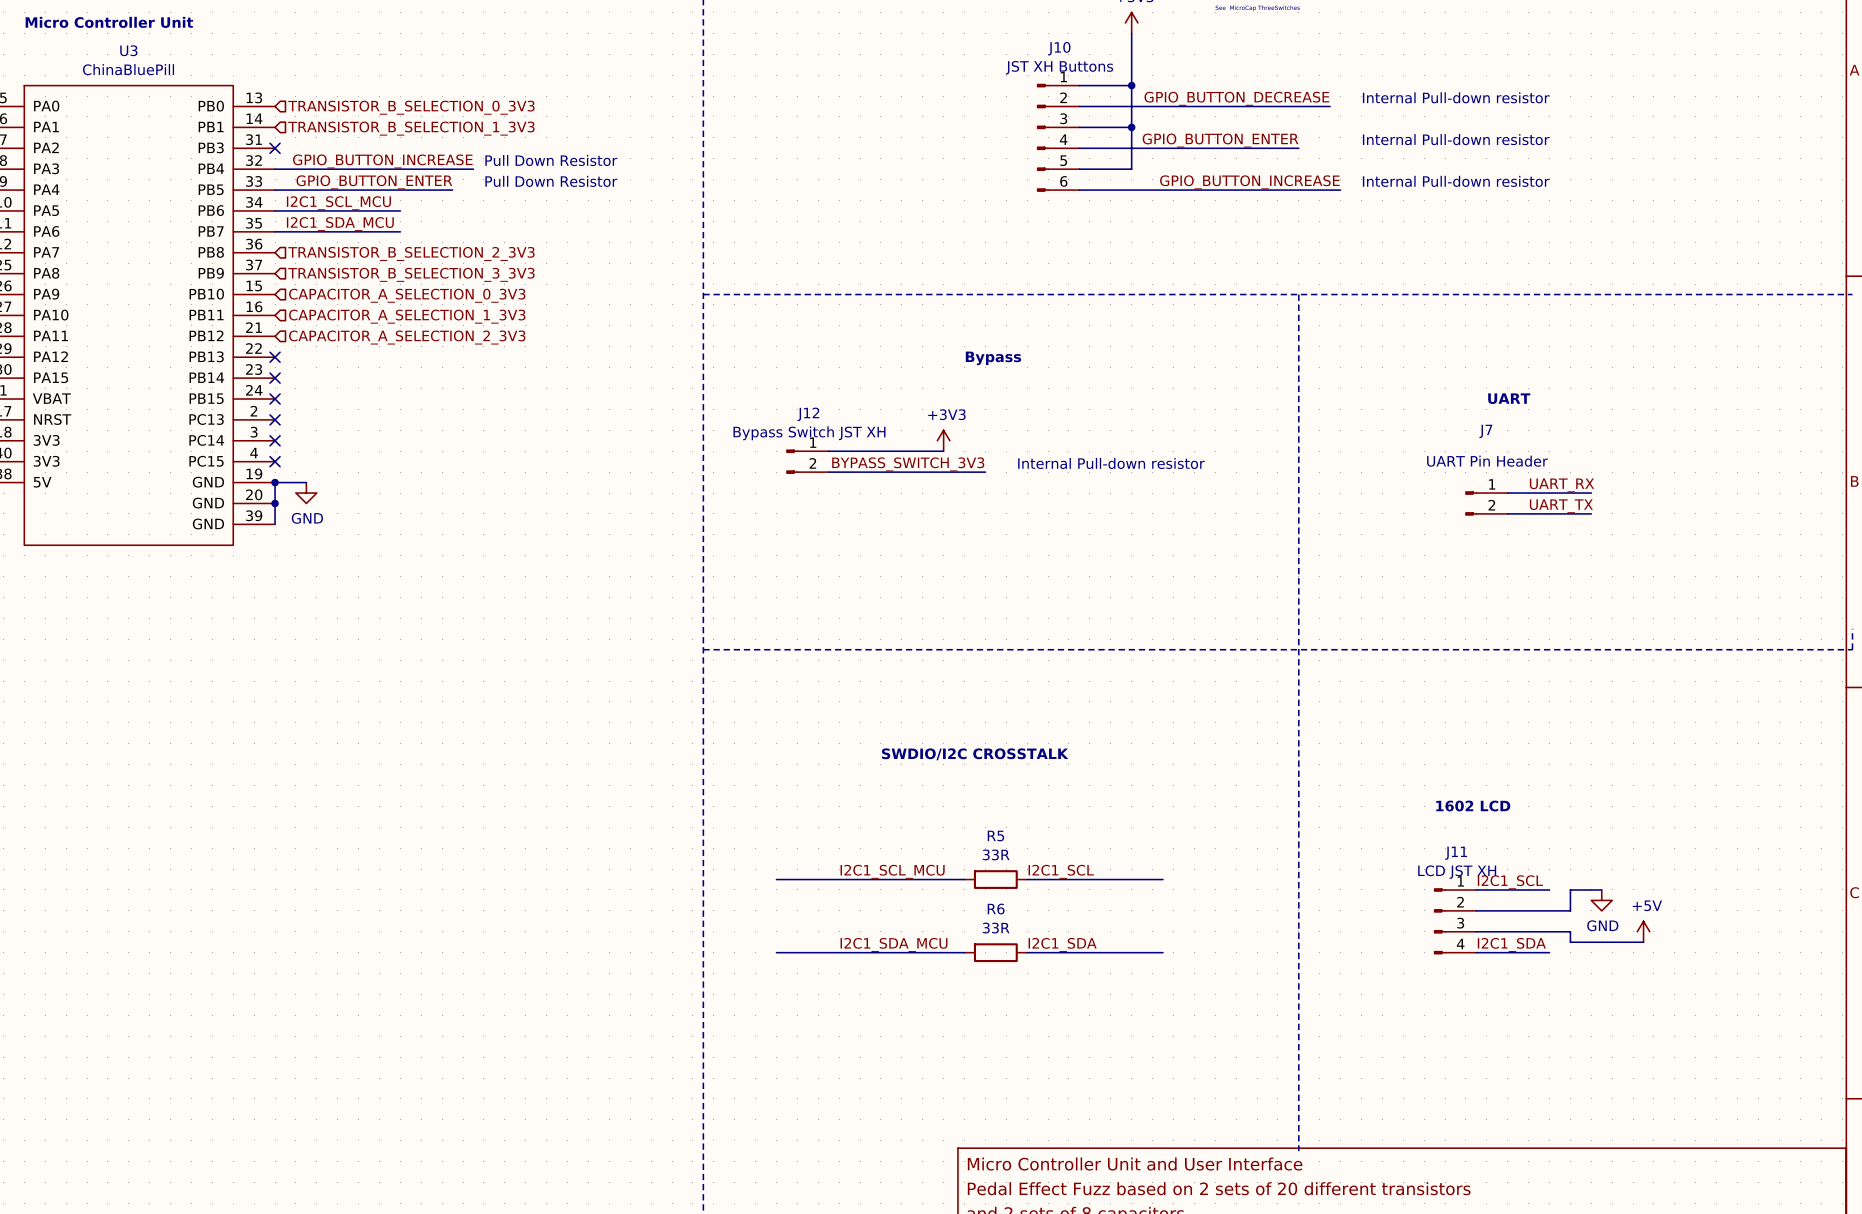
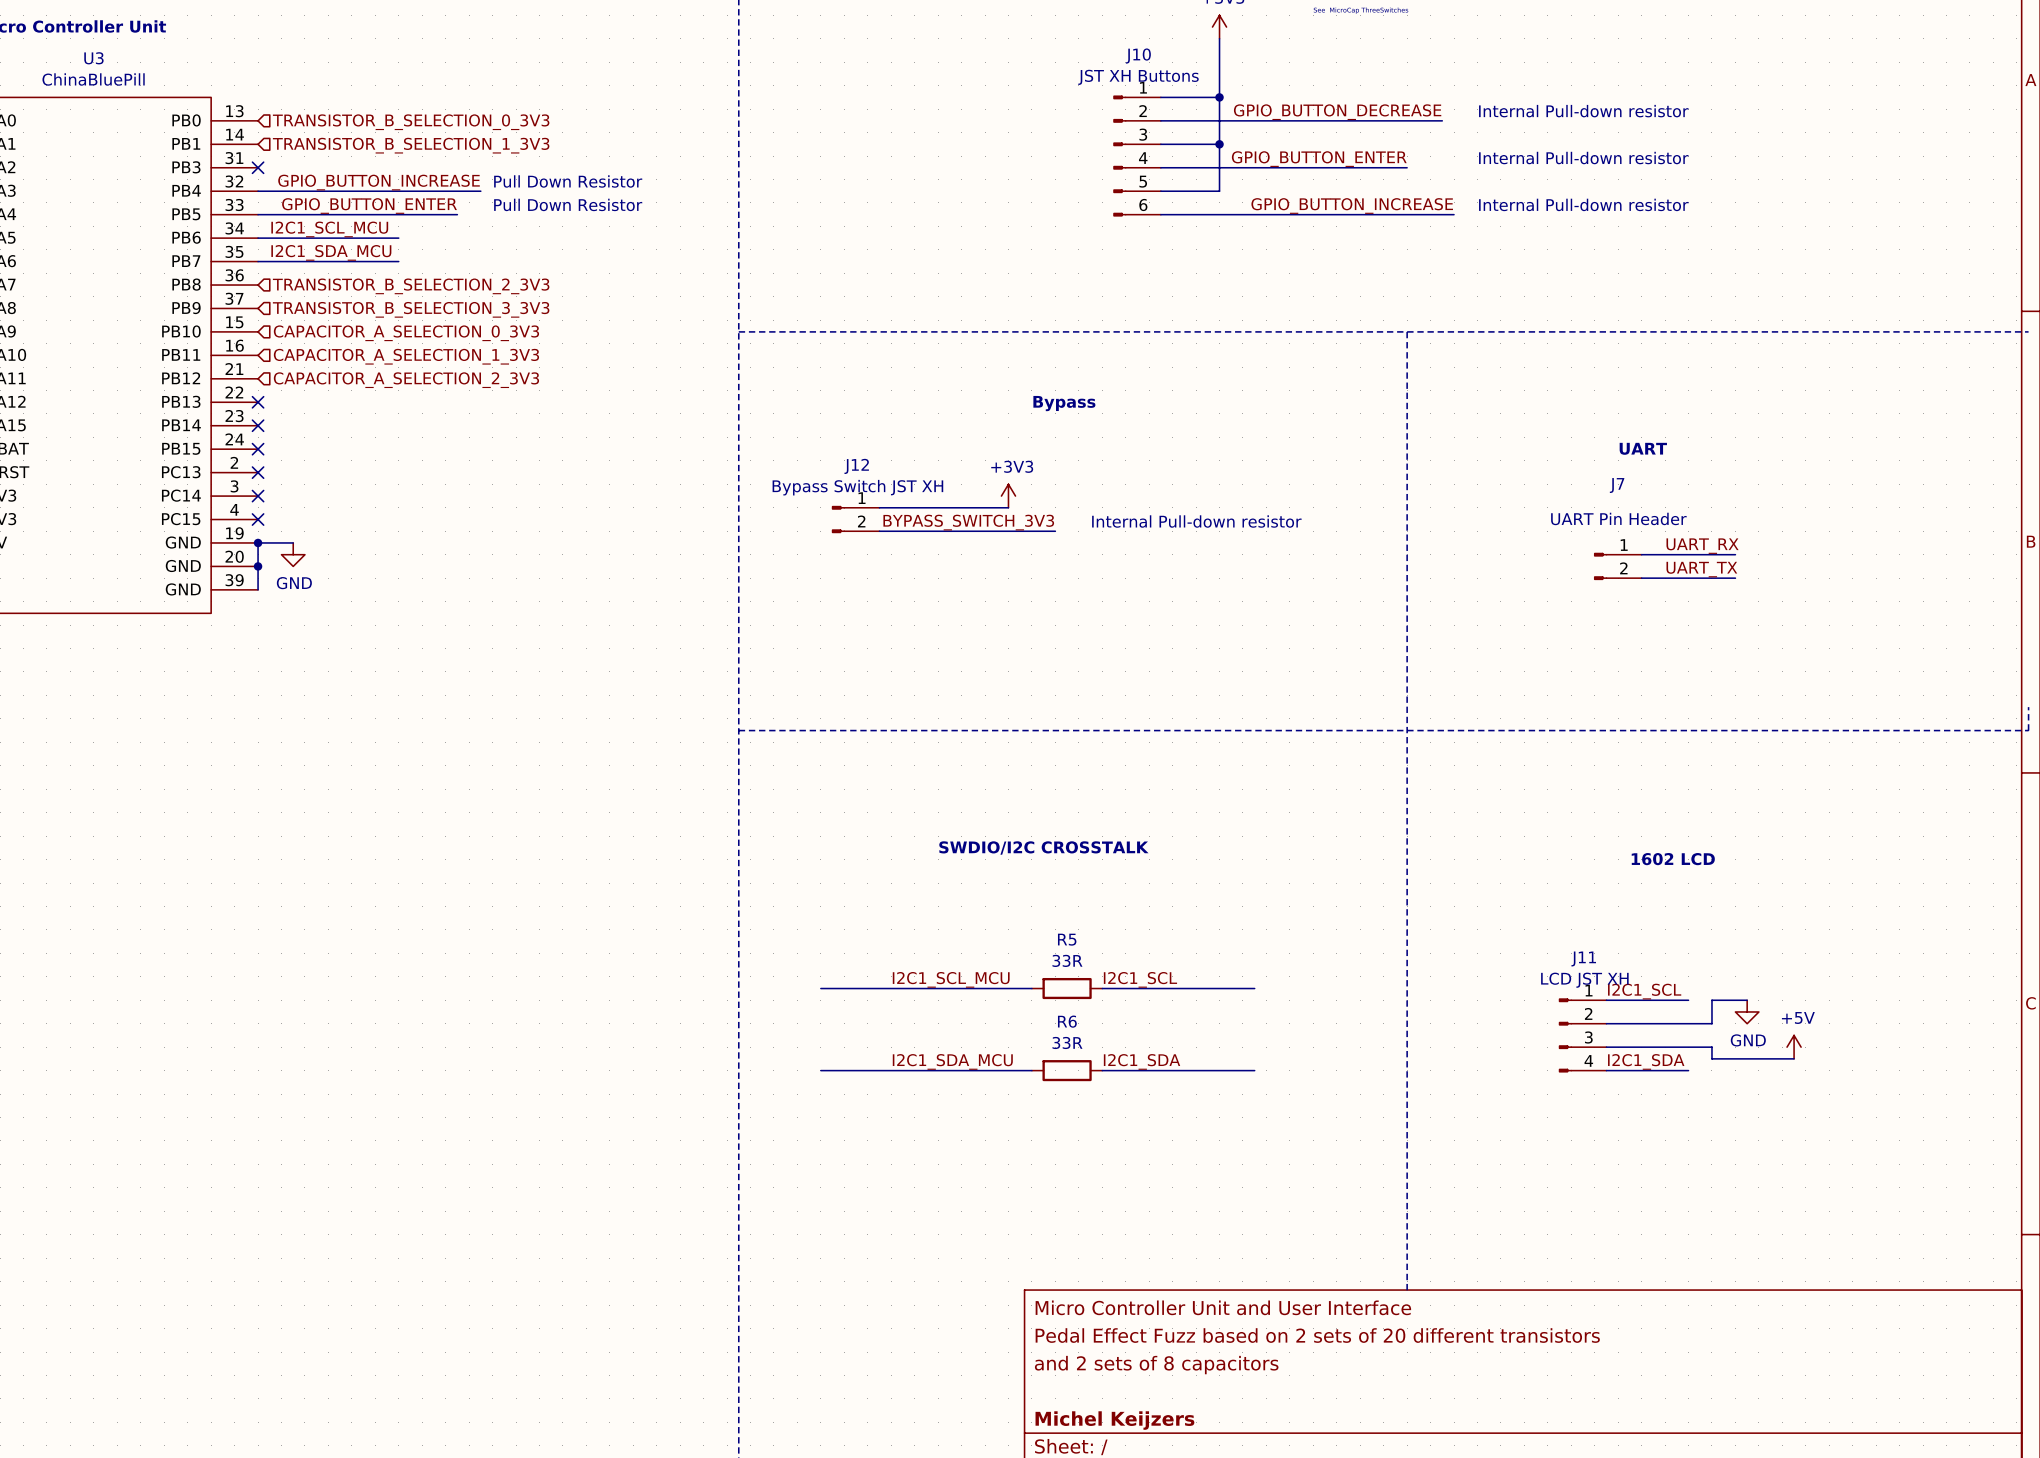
text position: 1602 LCD (1473, 806) -> 1602 LCD (1673, 859)

